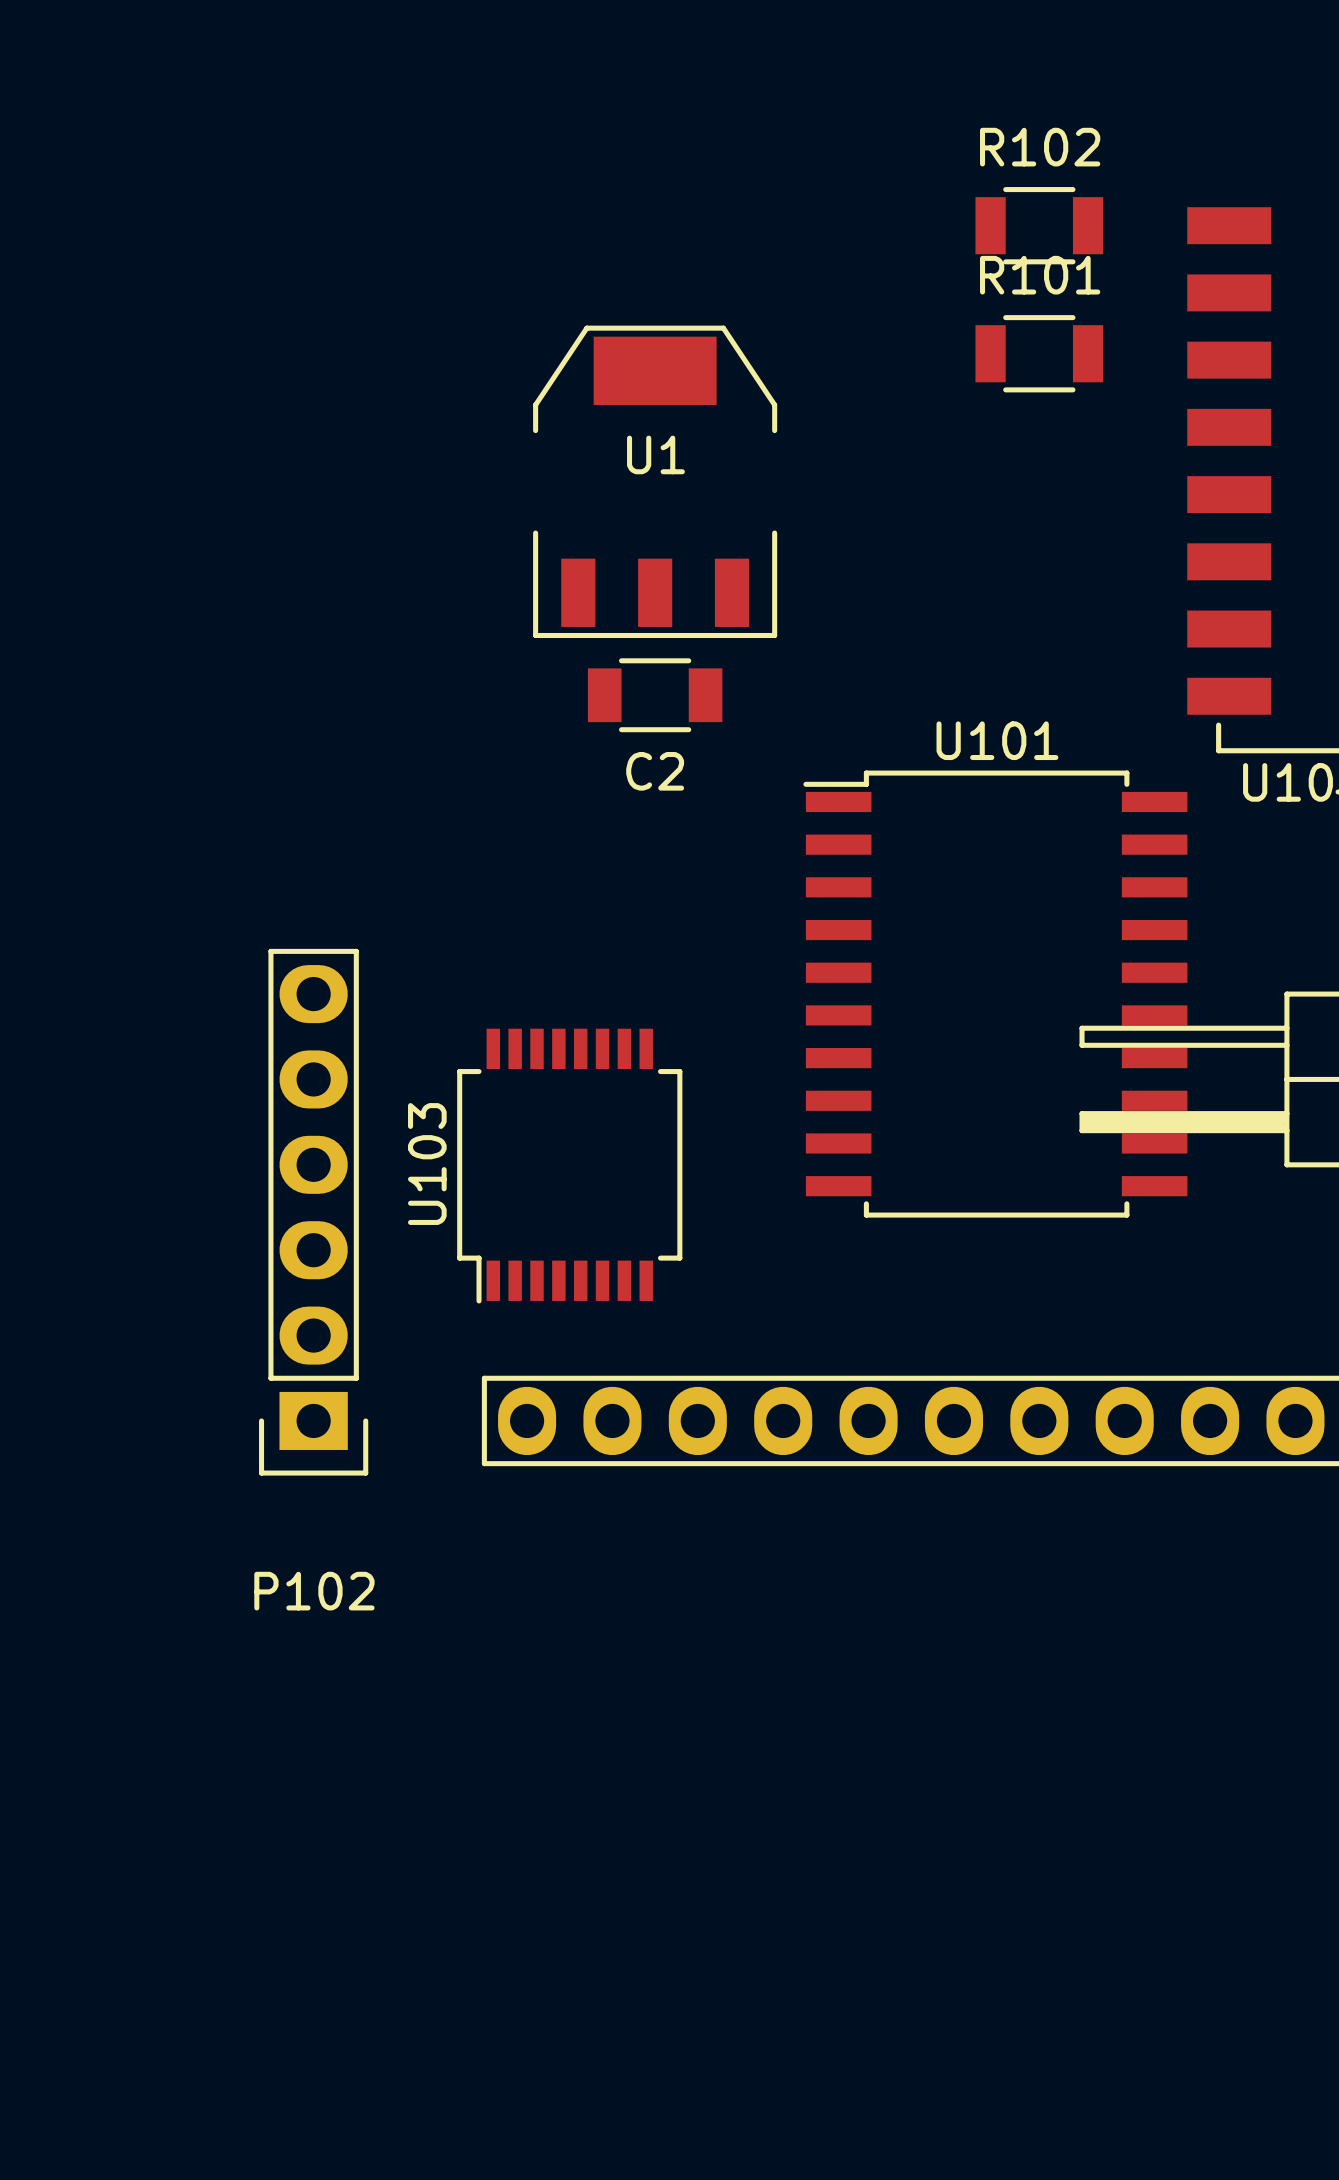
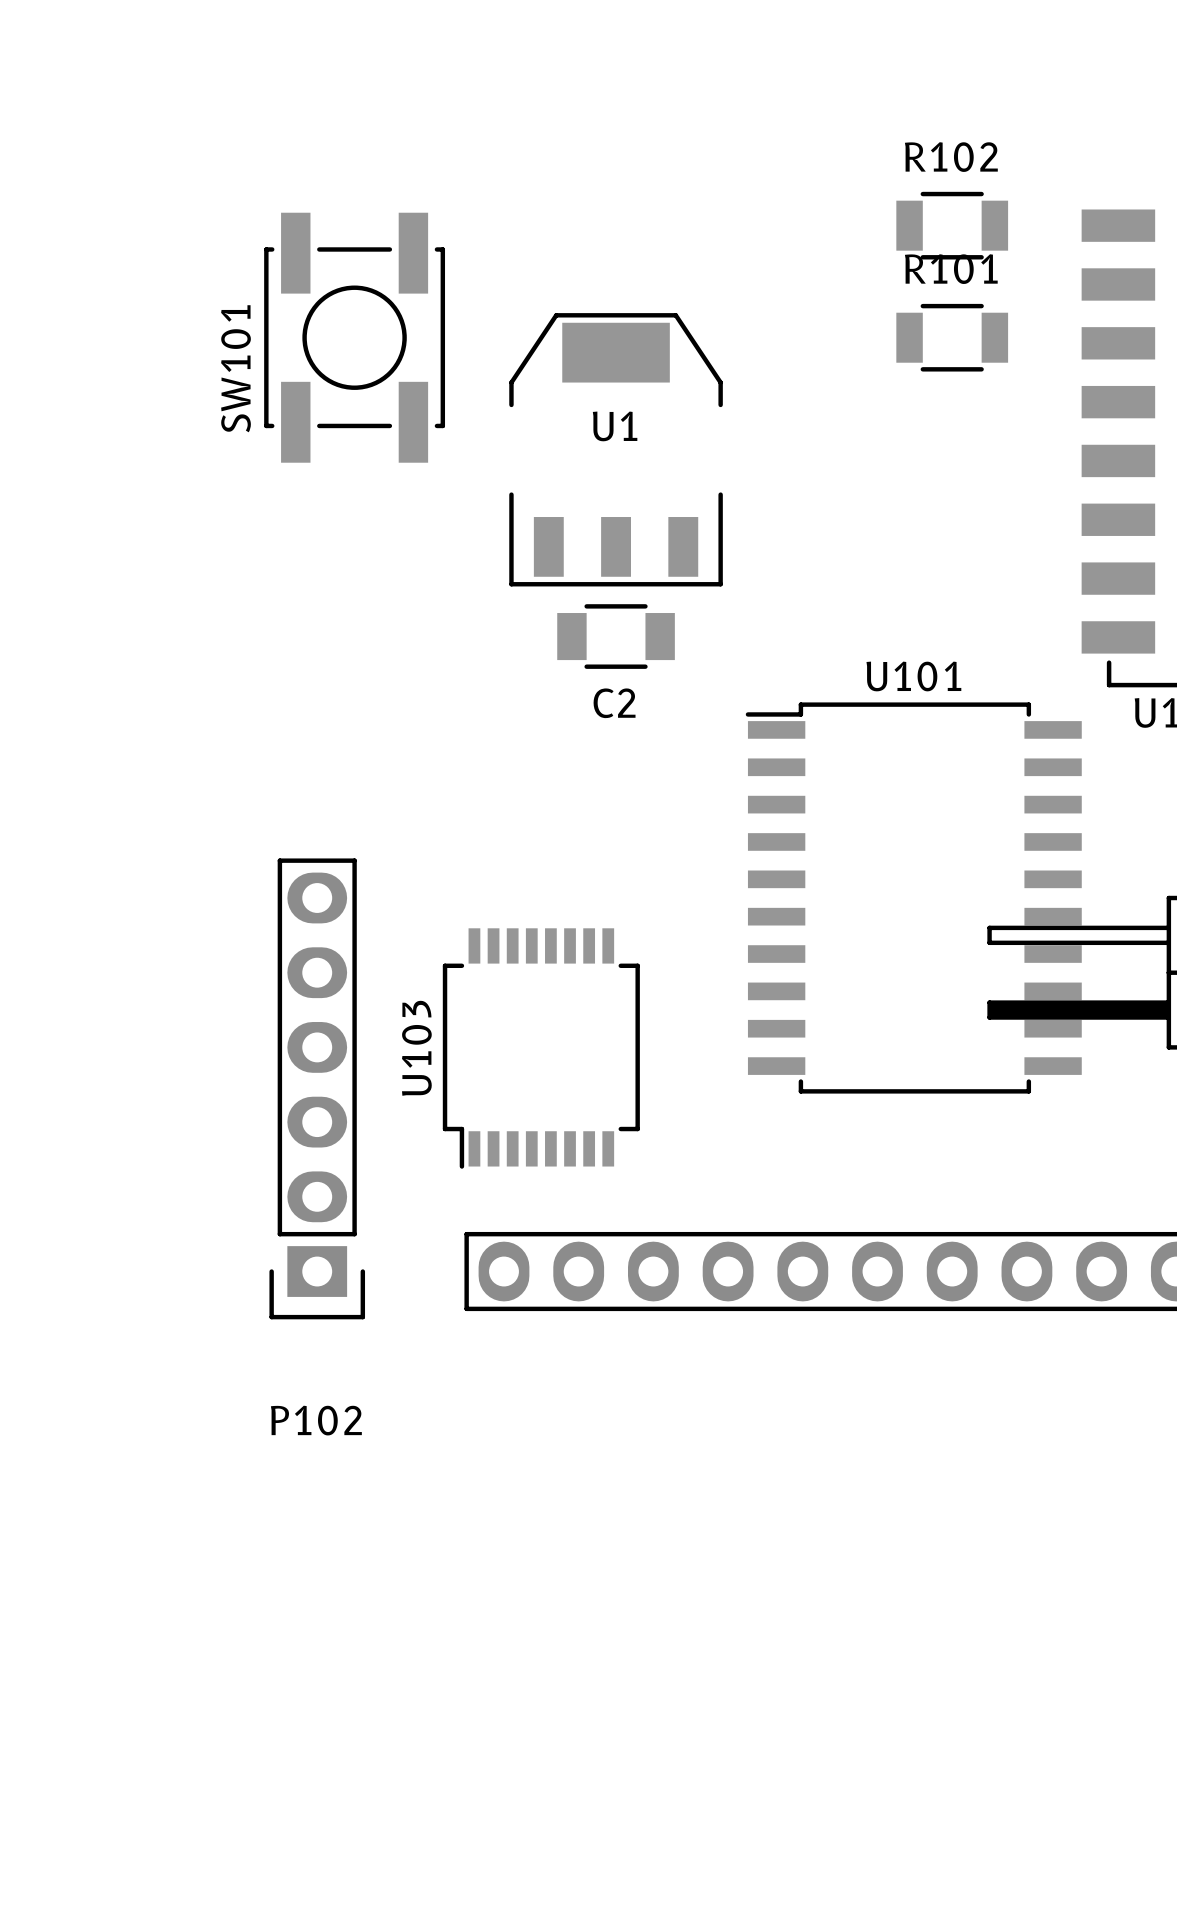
SW101: none -> (354, 337)

